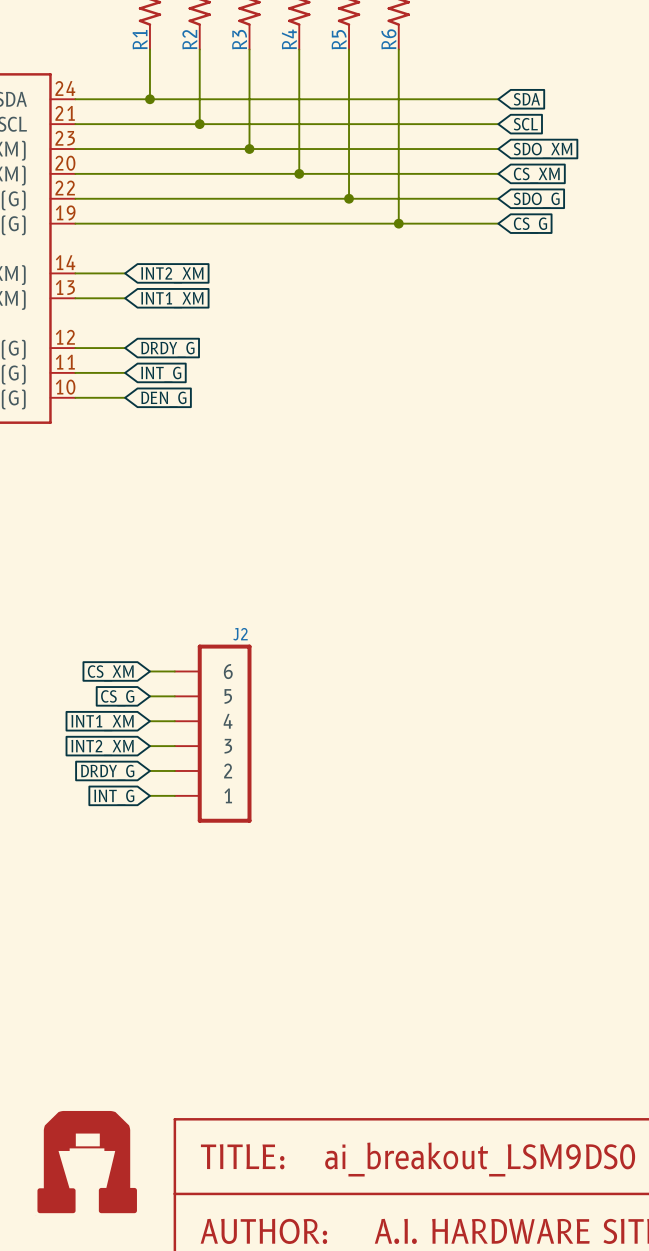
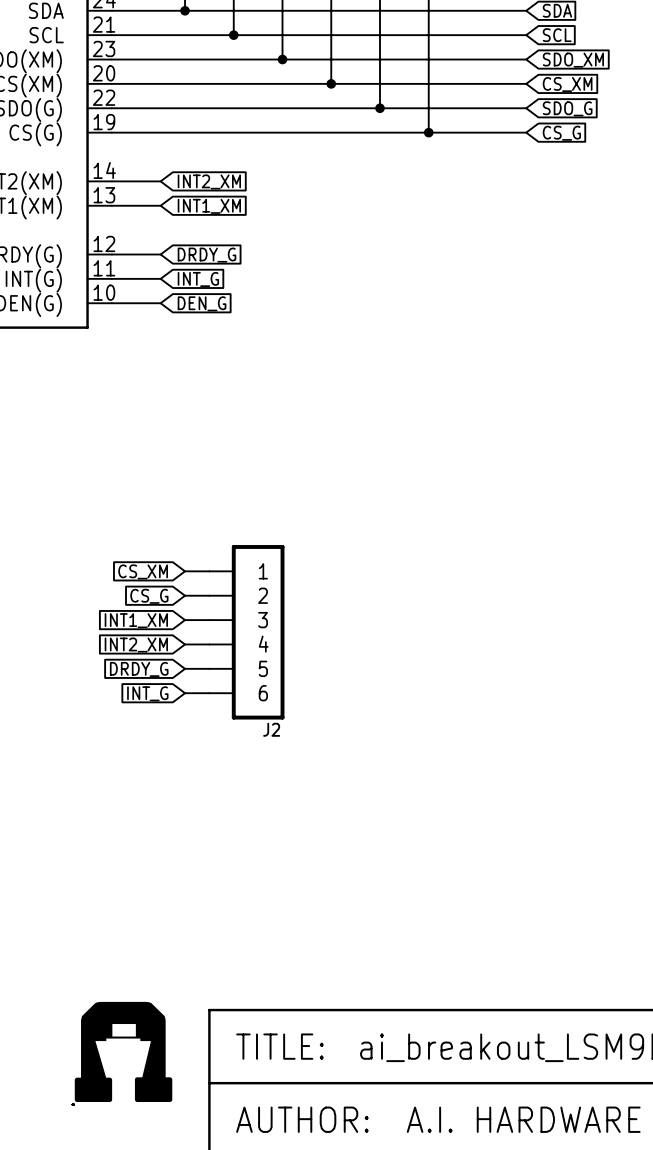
J2 flip: as is (224, 733) -> up-down (258, 632)

